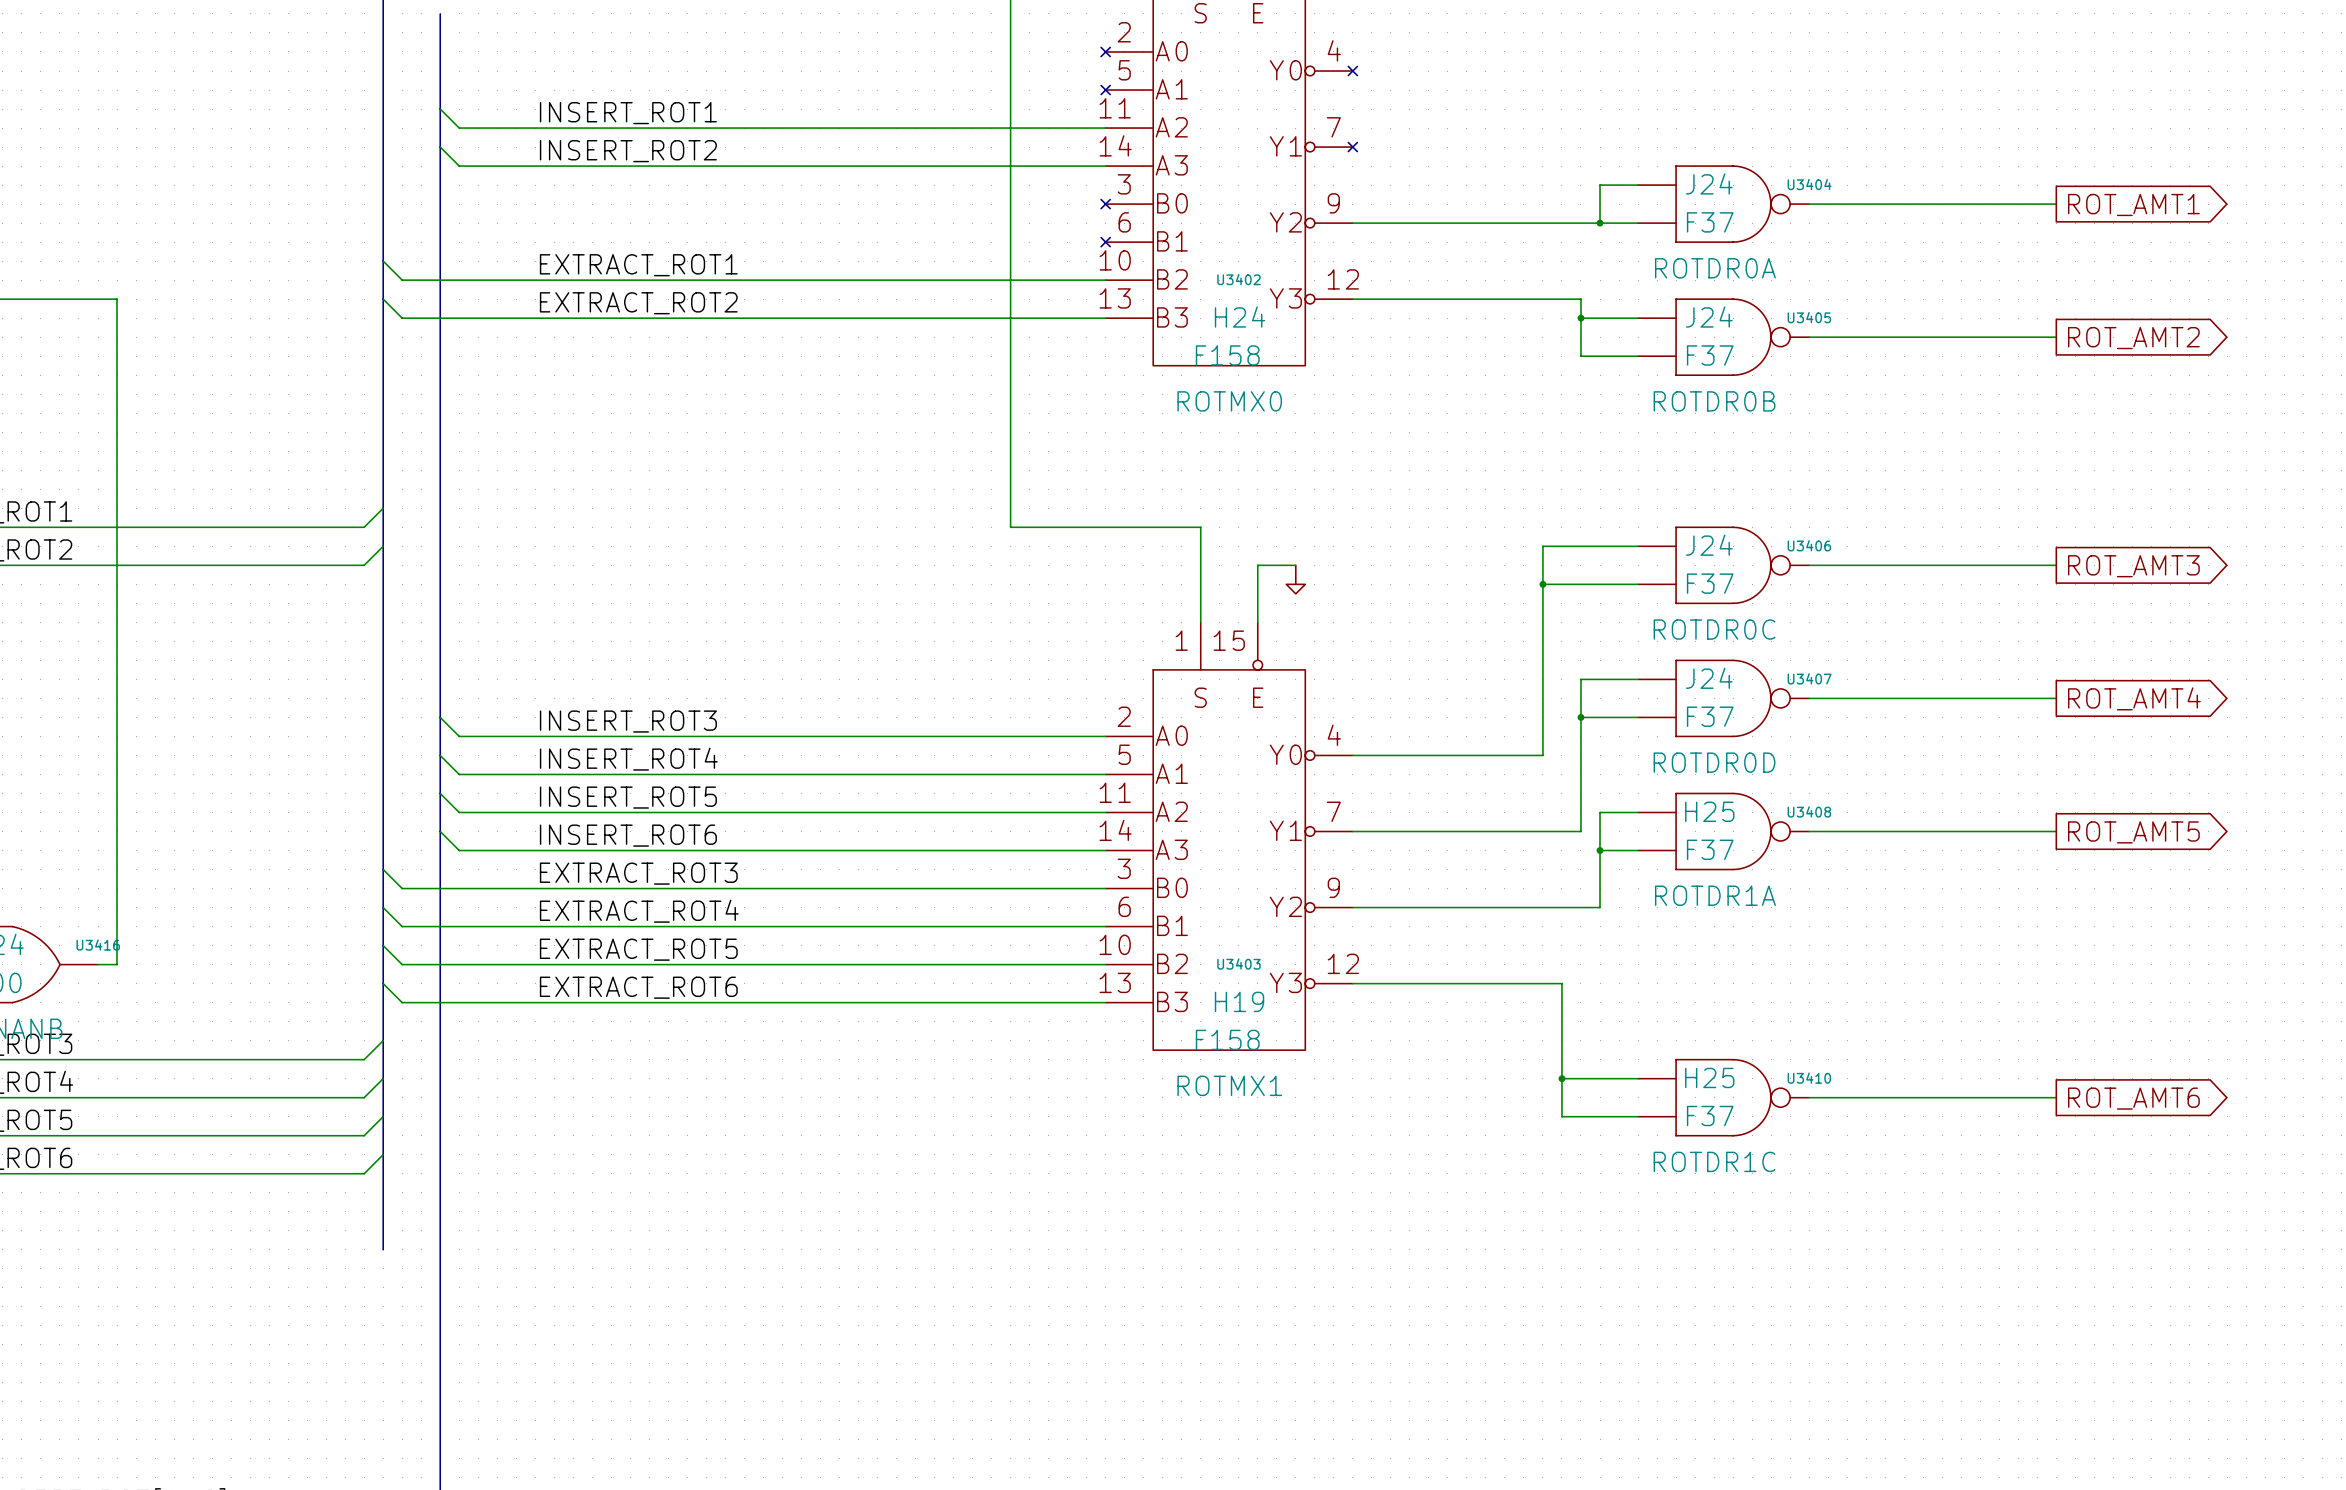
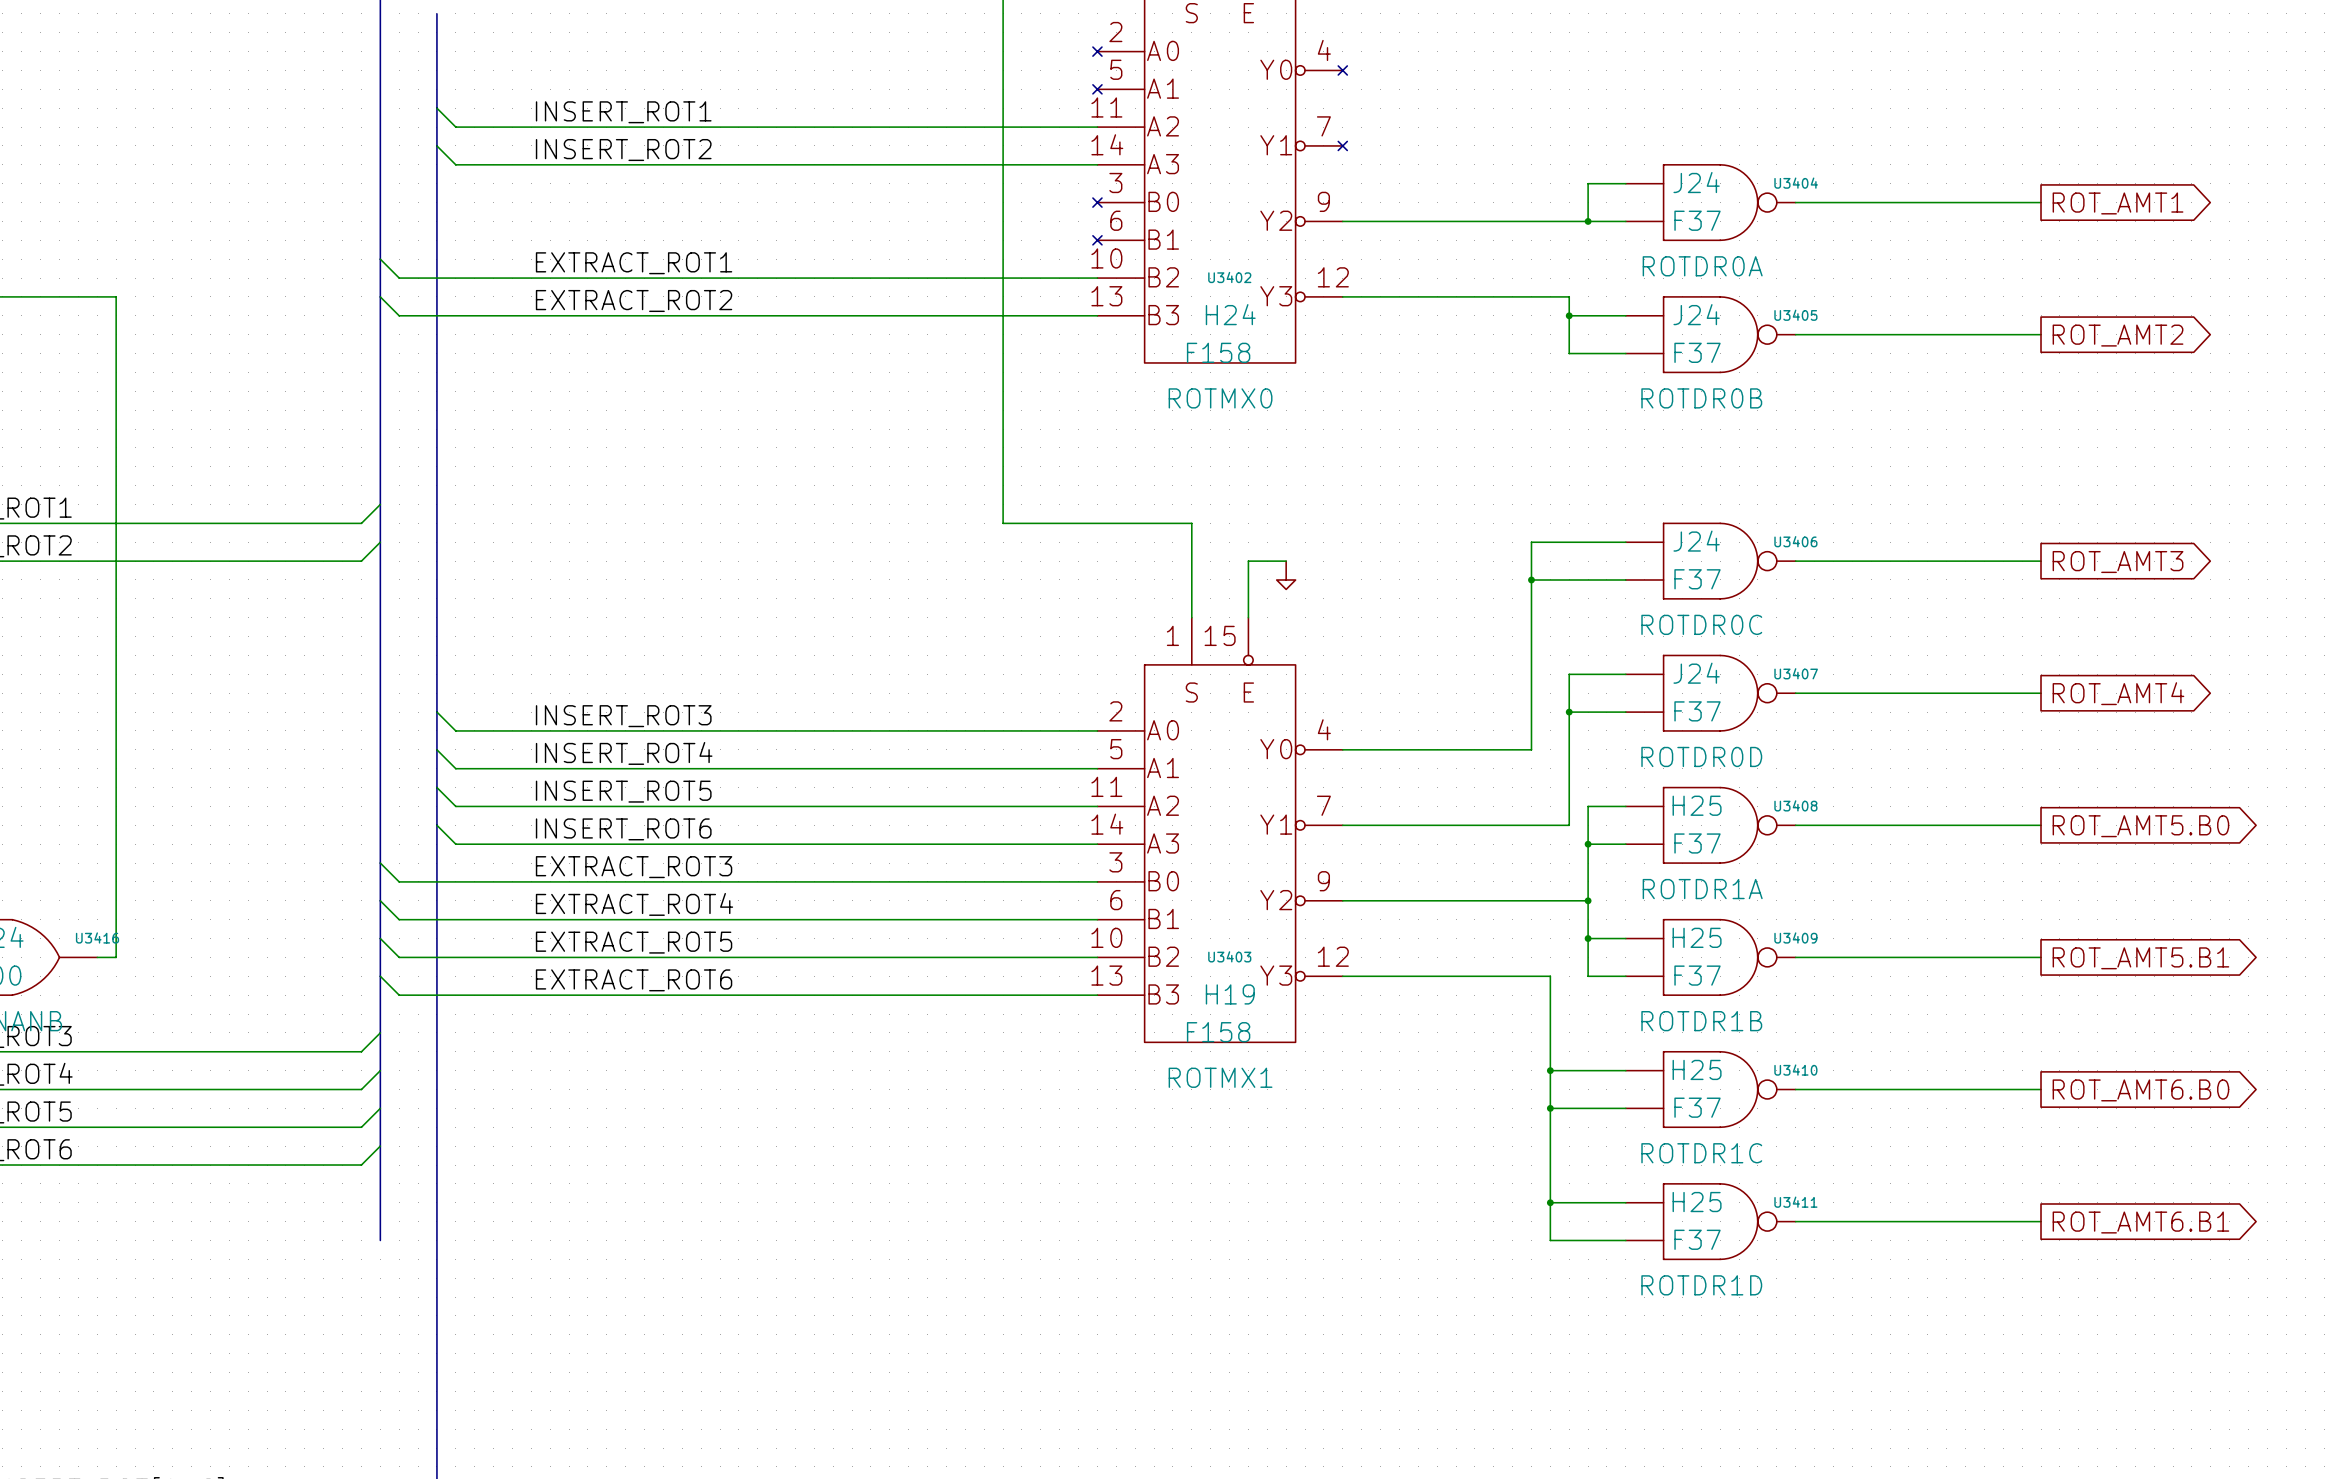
global label: ROT_AMT5 (2133, 832) -> ROT_AMT5.B0 (2140, 826)
wire: none -> (1588, 900) (1588, 976) (1625, 976)
junction: none -> (1588, 900)
wire: none -> (1588, 938) (1625, 938)
junction: none -> (1588, 938)
U3409: none -> F37 (1710, 957)
wire: none -> (1795, 957) (2041, 957)
global label: none -> ROT_AMT5.B1 (2140, 958)
global label: ROT_AMT6 (2133, 1098) -> ROT_AMT6.B0 (2140, 1090)
wire: none -> (1550, 1108) (1550, 1240) (1625, 1240)
junction: none -> (1550, 1108)
wire: none -> (1550, 1202) (1625, 1202)
junction: none -> (1550, 1202)
U3411: none -> F37 (1710, 1221)
wire: none -> (1795, 1221) (2041, 1221)
global label: none -> ROT_AMT6.B1 (2140, 1222)

